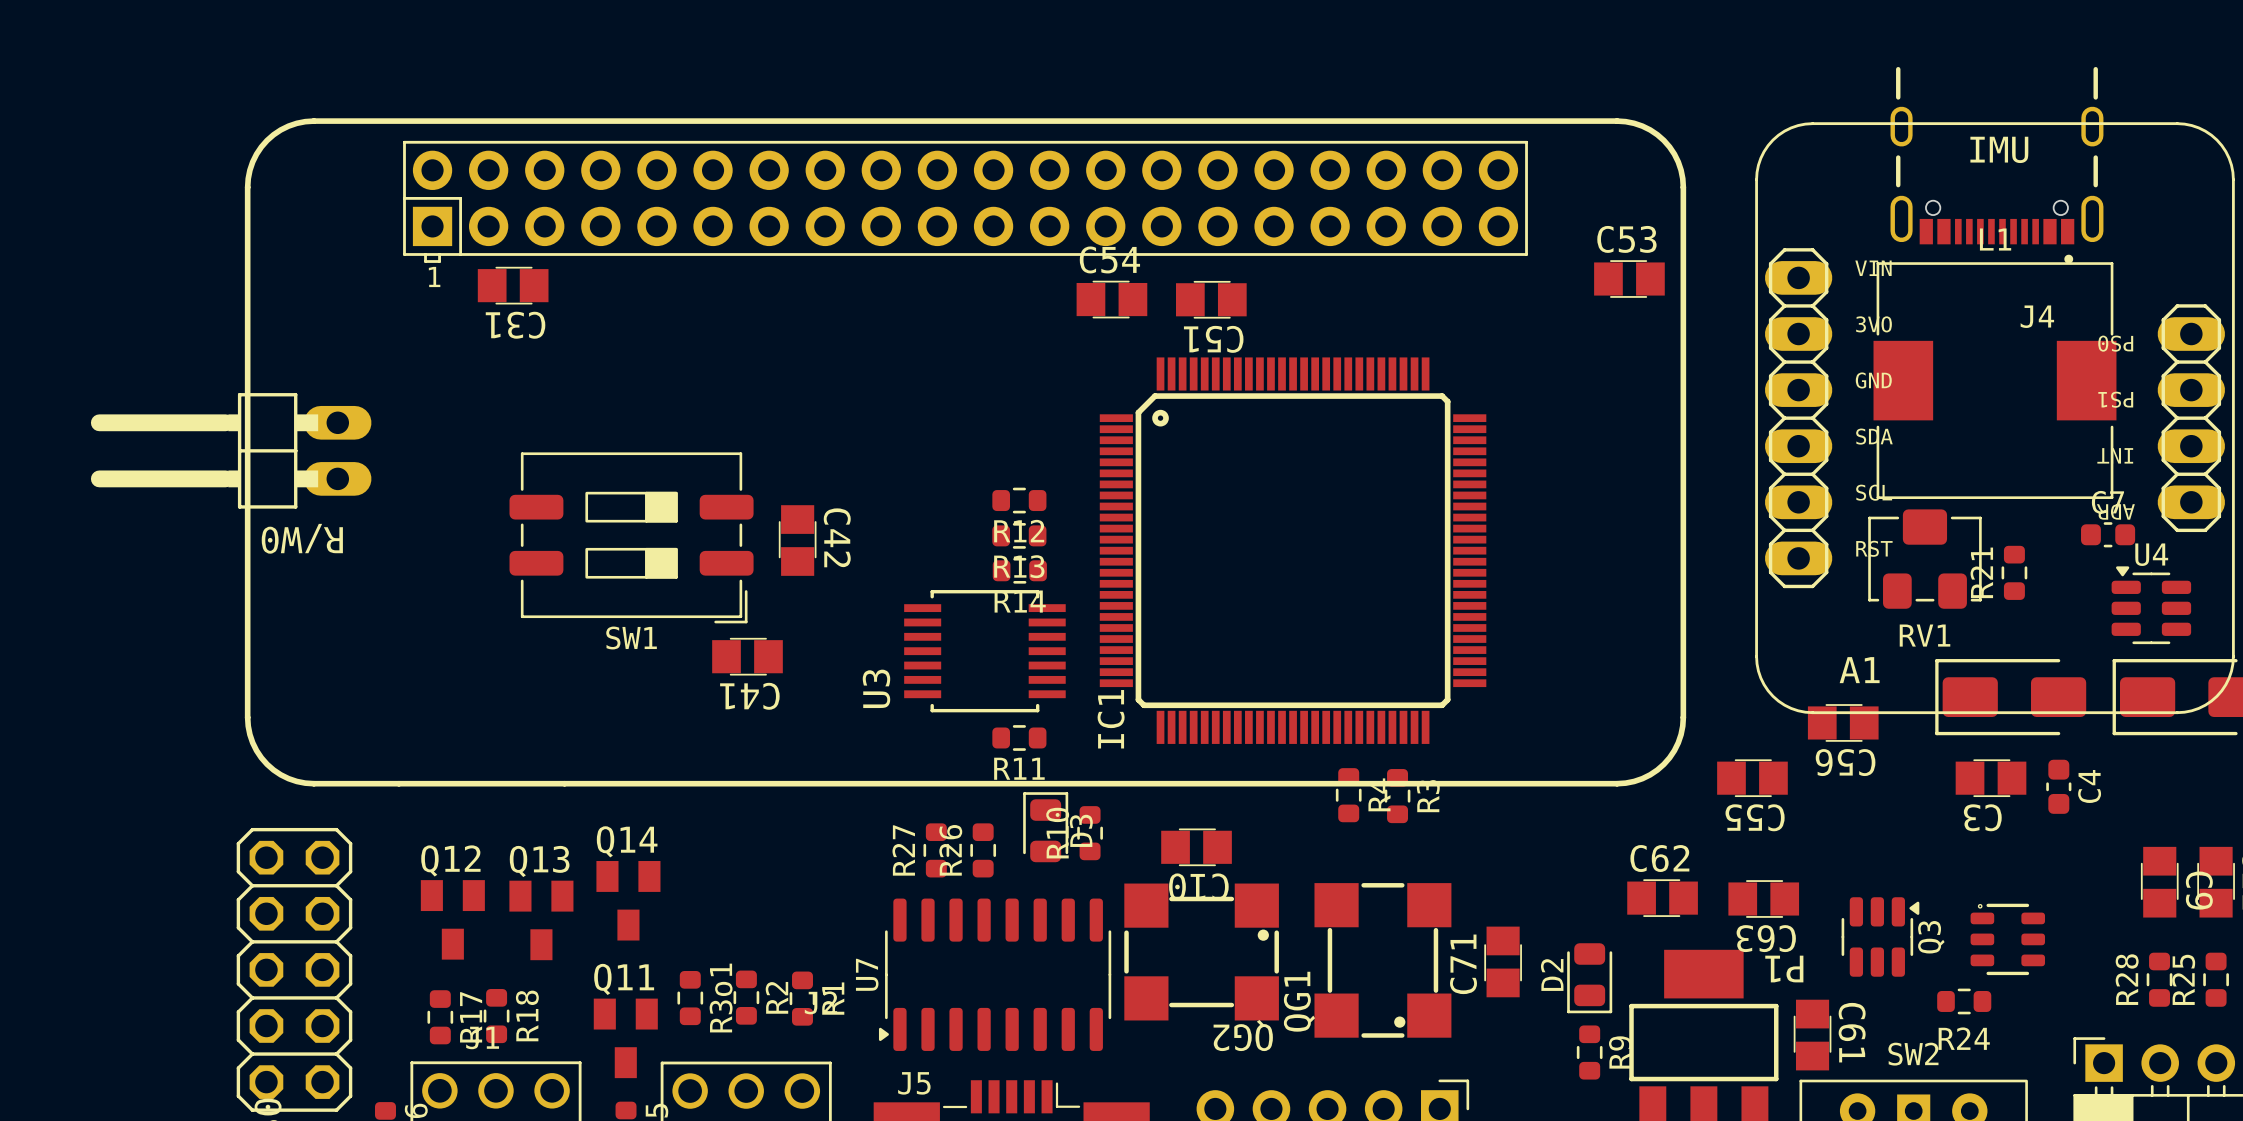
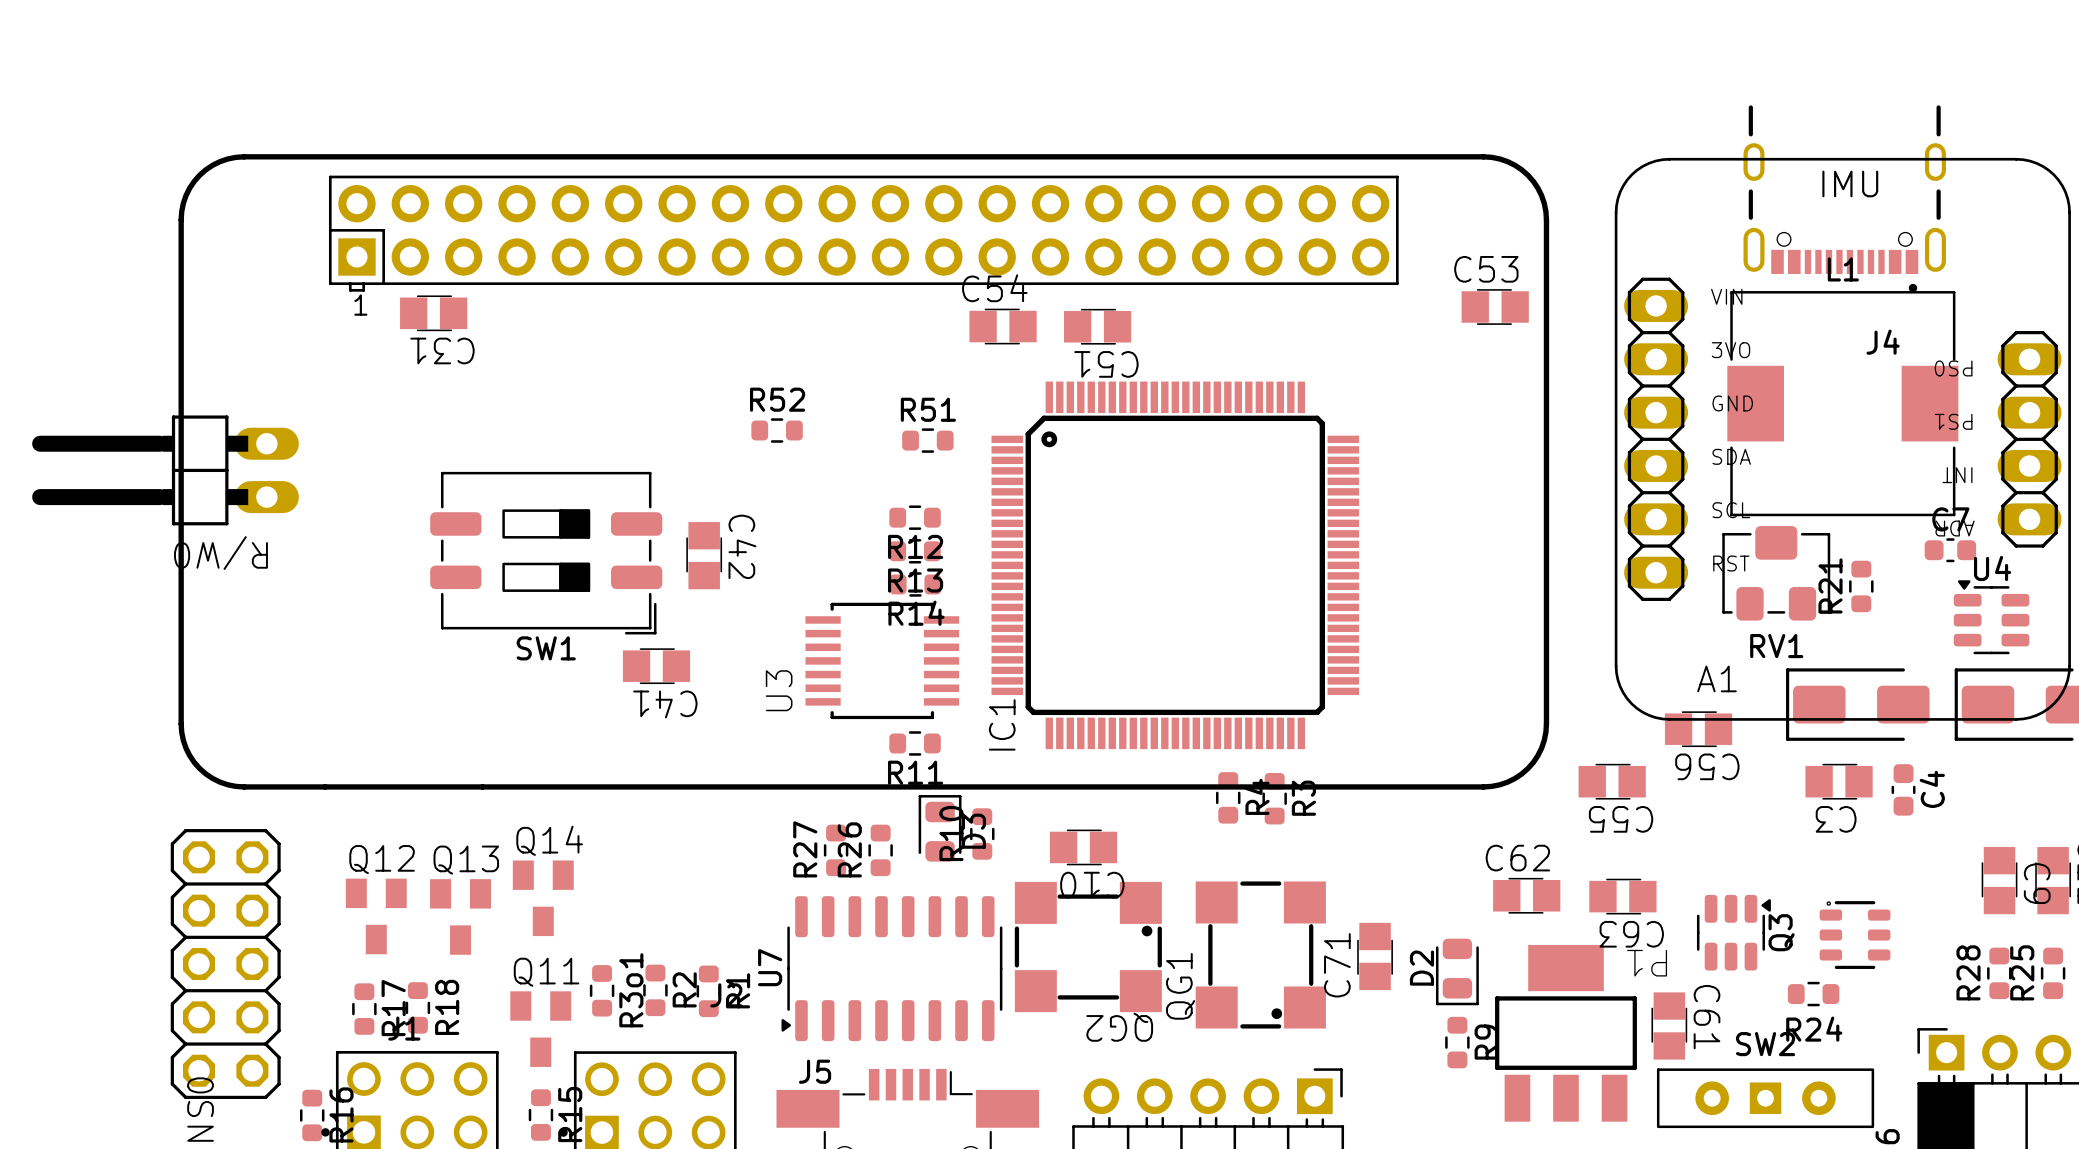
R52: none -> (777, 430)
R51: none -> (927, 440)

